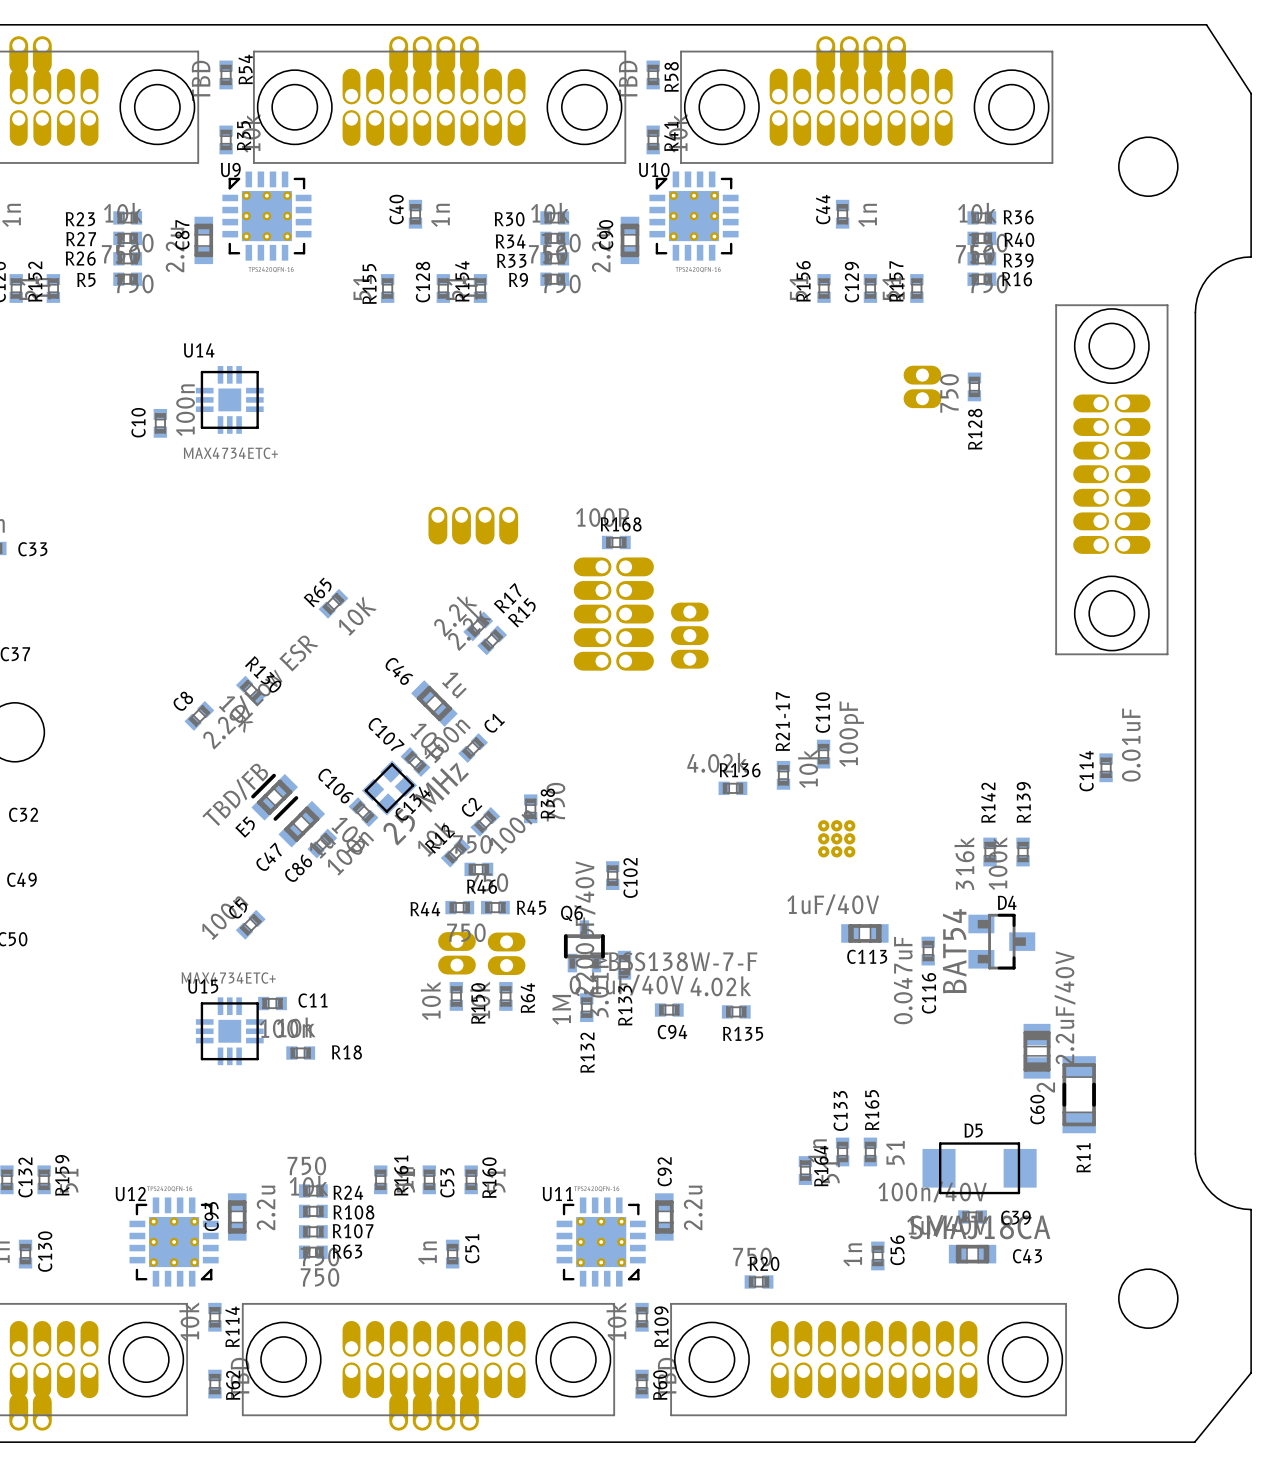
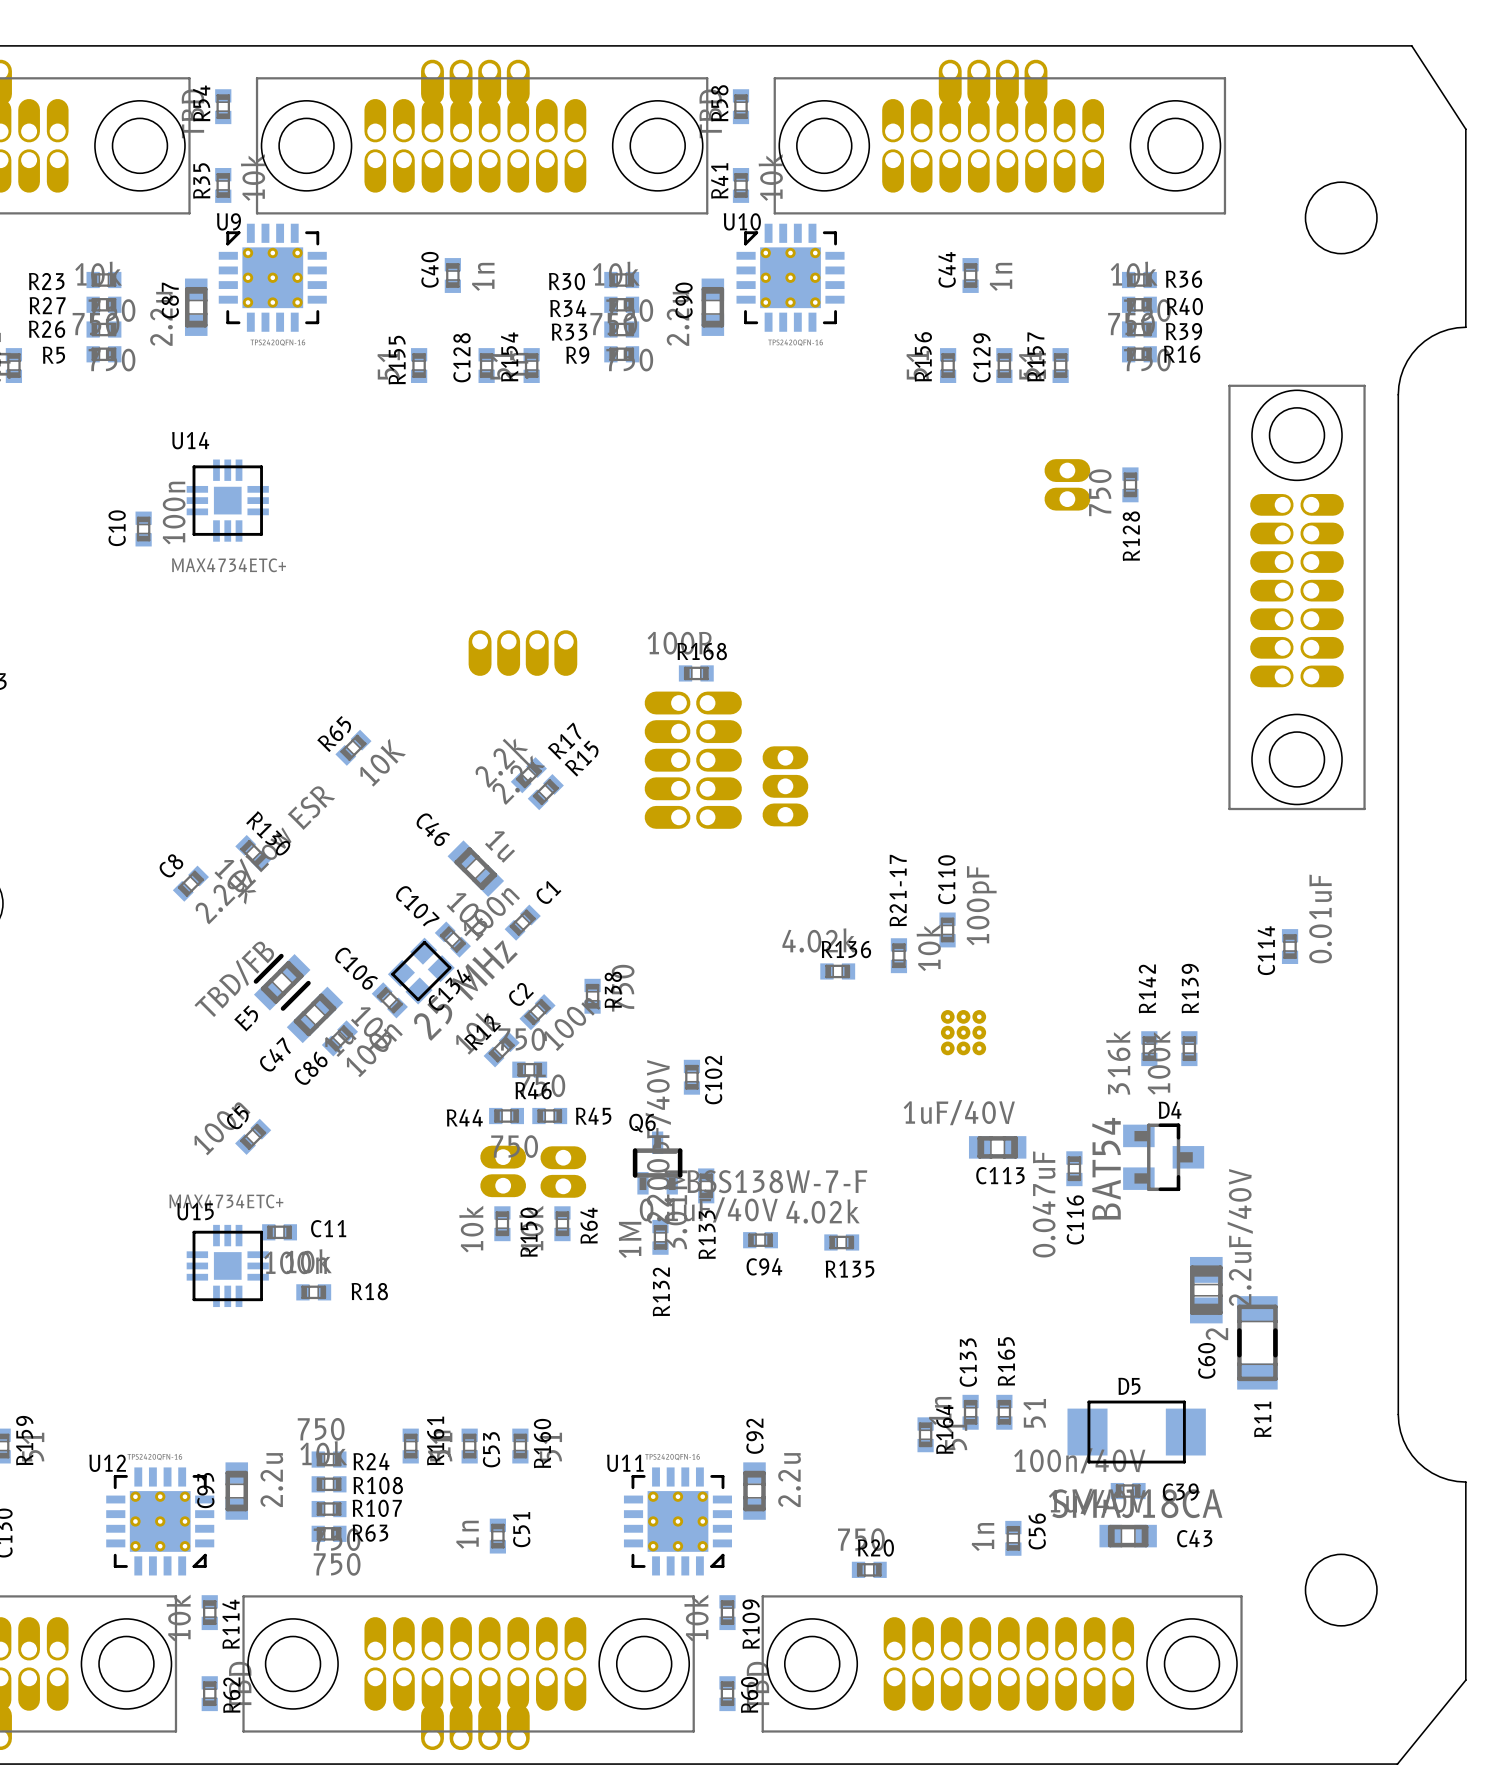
R54 name position: R54 (245, 69) -> R54 (201, 103)
R58 name position: R58 (671, 77) -> R58 (719, 103)
R35 name position: R35 (244, 135) -> R35 (201, 180)
R41 name position: R41 (671, 136) -> R41 (719, 180)

